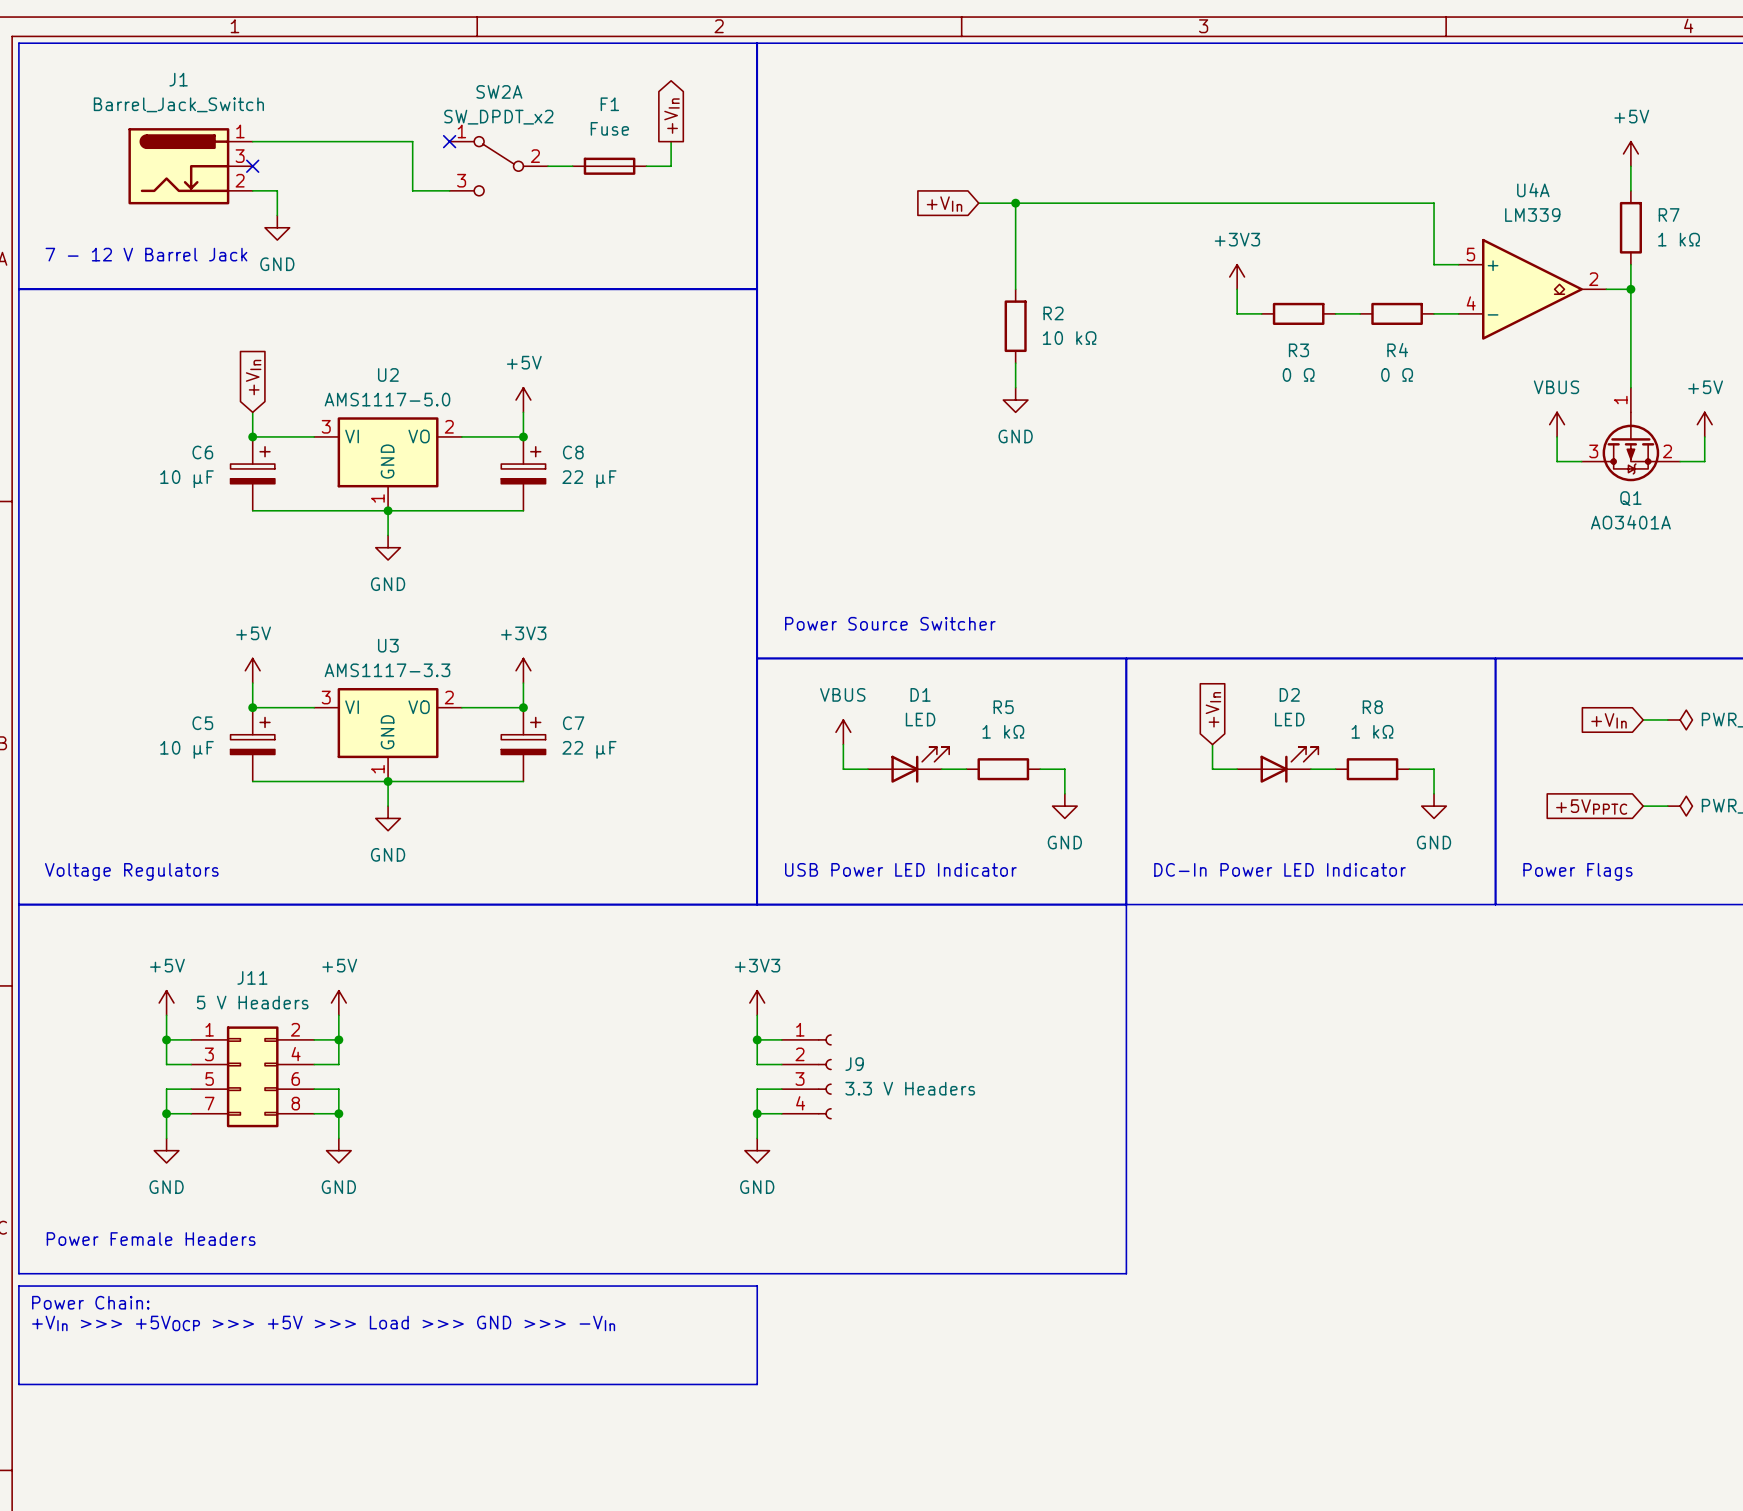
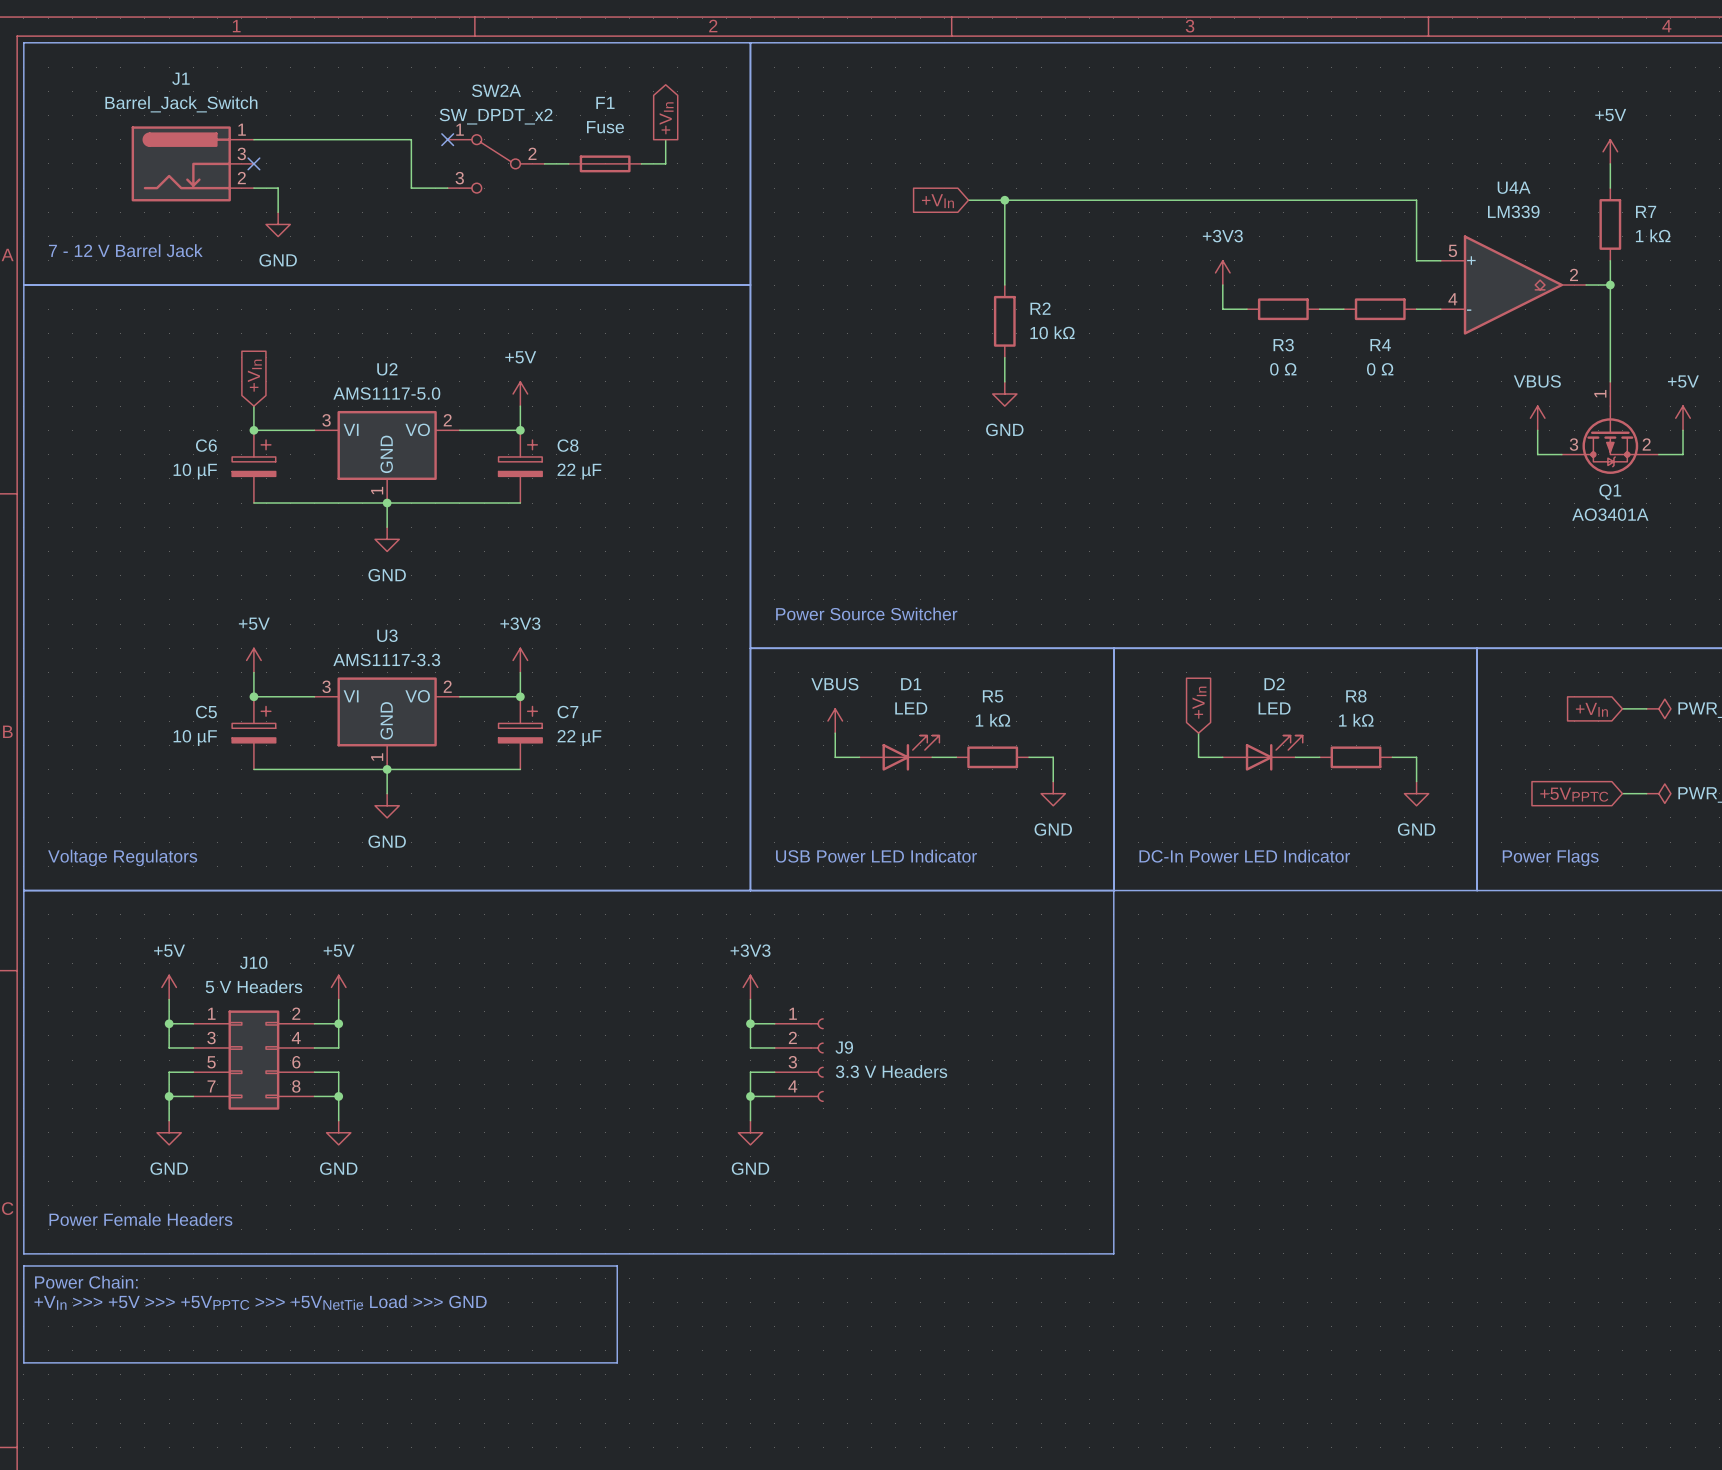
J11 name: J11 (252, 977) -> J10 (253, 962)
line: (621, 1286) (757, 1286) (757, 1384) (621, 1384) -> (617, 1265) (617, 1362)
text: +VIn >>> +5VOCP >>> +5V >>> Load >>> GND >>> -VIn (323, 1323) -> +VIn >>> +5V >>> +5VPPTC >>> +5VNetTie Load >>> GND (260, 1302)

